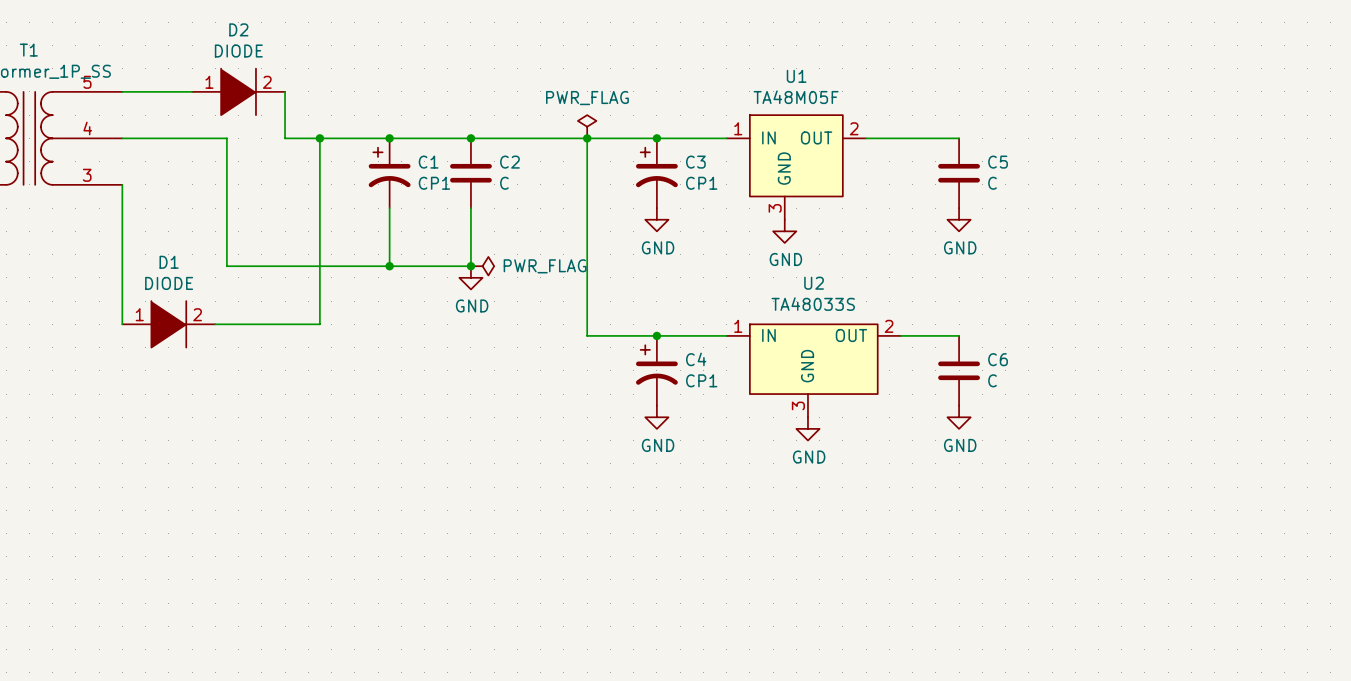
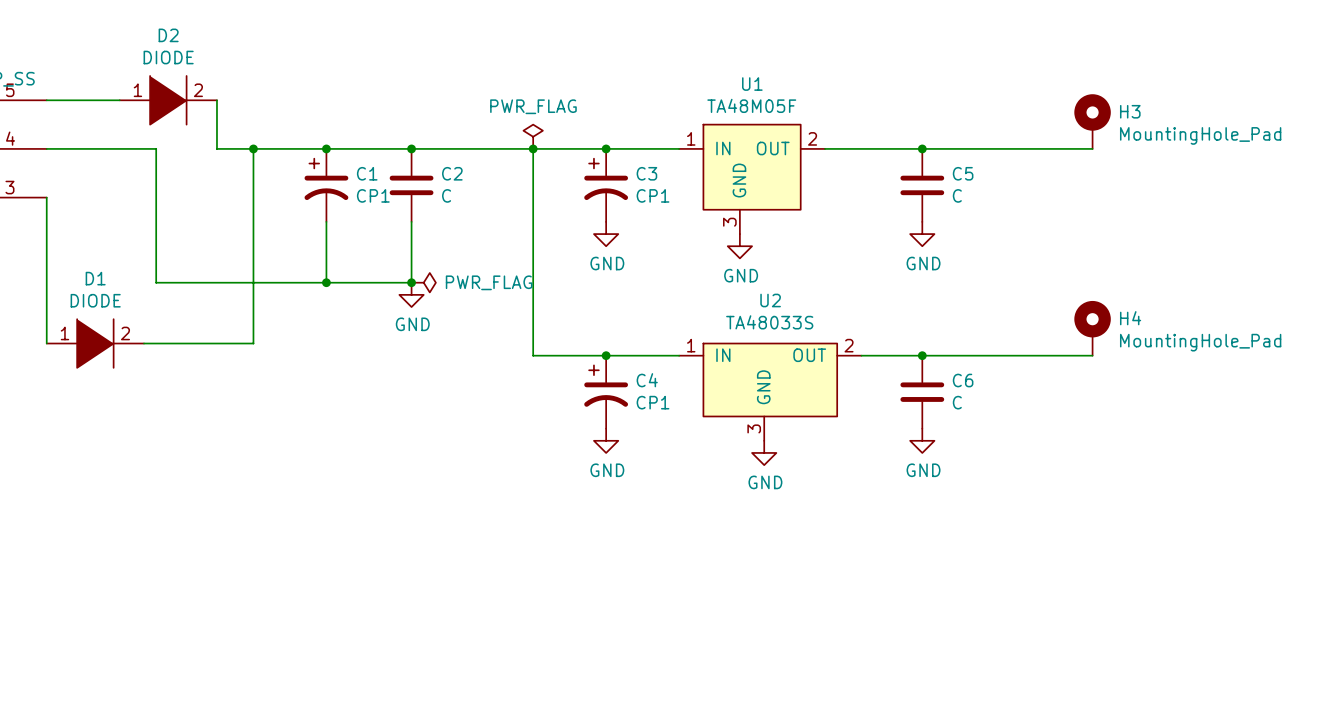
H3: none -> MountingHole_Pad (1092, 121)
wire: none -> (922, 148) (1092, 148)
junction: none -> (922, 148)
H4: none -> MountingHole_Pad (1092, 328)
wire: none -> (922, 355) (1092, 355)
junction: none -> (922, 355)

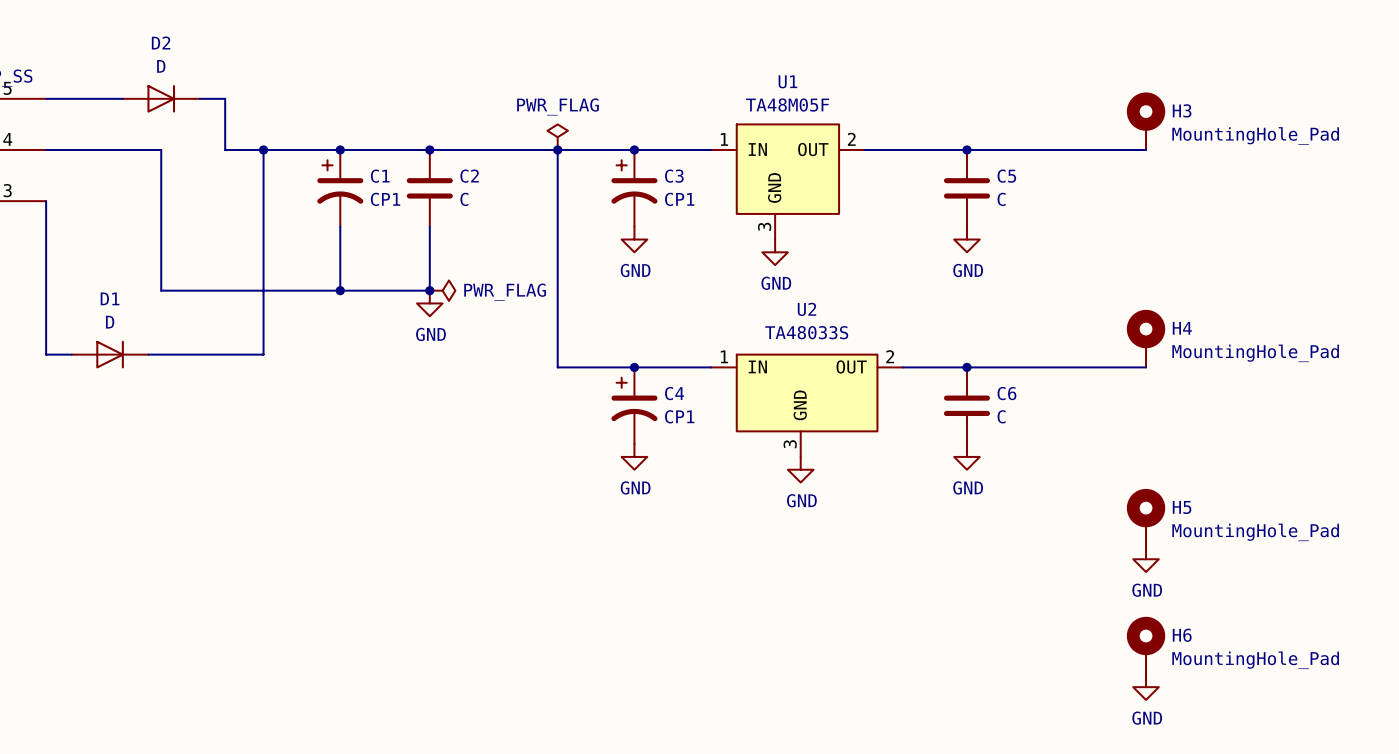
D2 value: DIODE (168, 57) -> D (161, 66)
D2 symbol: [119, 75, 217, 125] -> [122, 85, 200, 113]
D1 value: DIODE (95, 300) -> D (110, 322)
D1 symbol: [46, 319, 145, 368] -> [71, 340, 149, 369]
H5: none -> MountingHole_Pad (1146, 517)
power symbol: none -> GND (1146, 559)
H6: none -> MountingHole_Pad (1146, 645)
power symbol: none -> GND (1146, 687)

